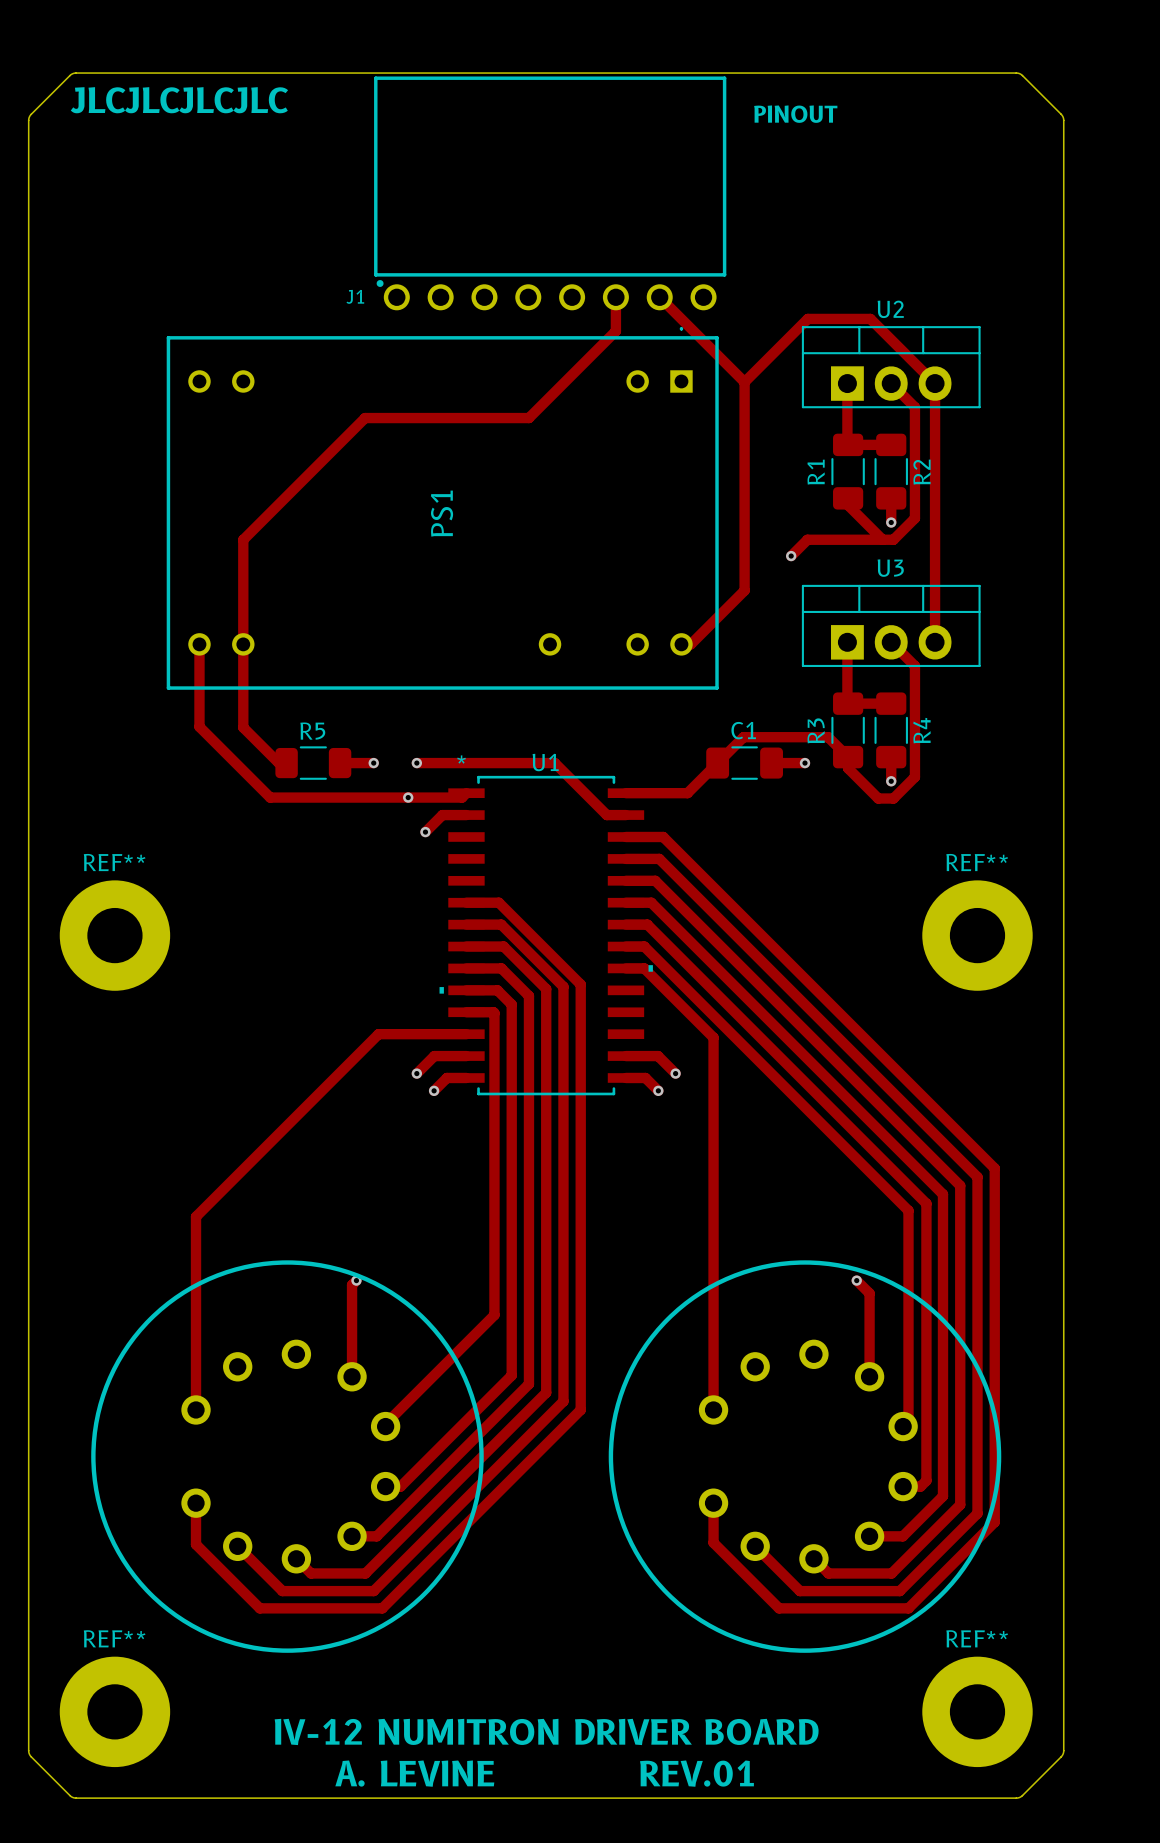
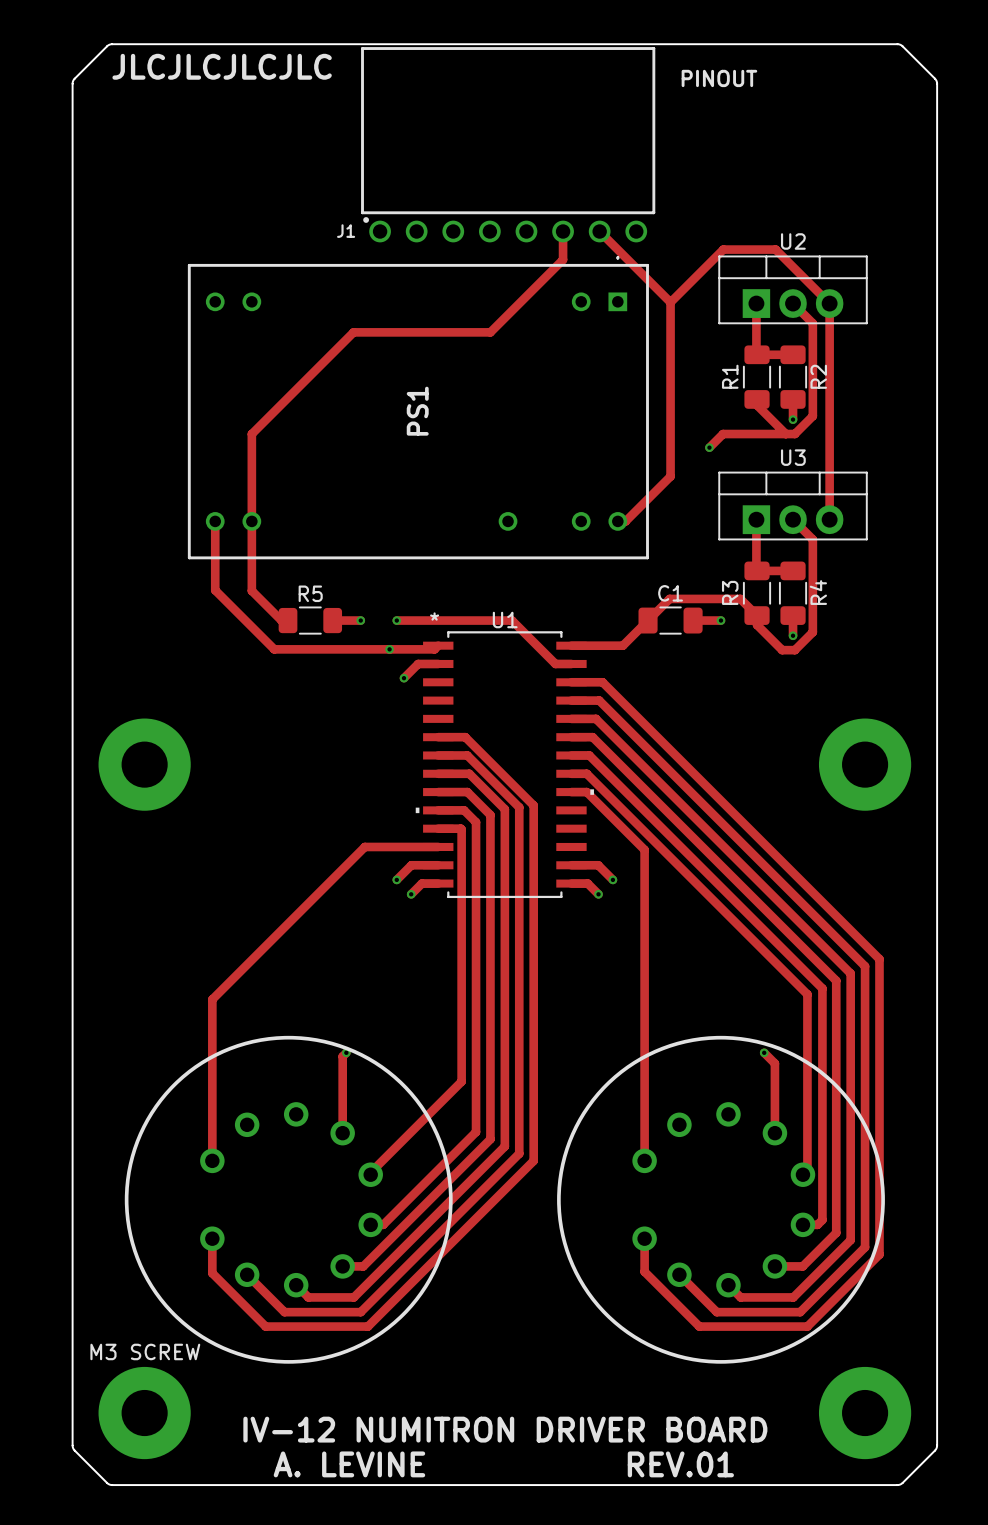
REF** name: REF** (114, 862) -> none
REF** name: REF** (977, 862) -> none
REF** name: REF** (114, 1638) -> M3 SCREW (145, 1351)
REF** name: REF** (977, 1638) -> none

